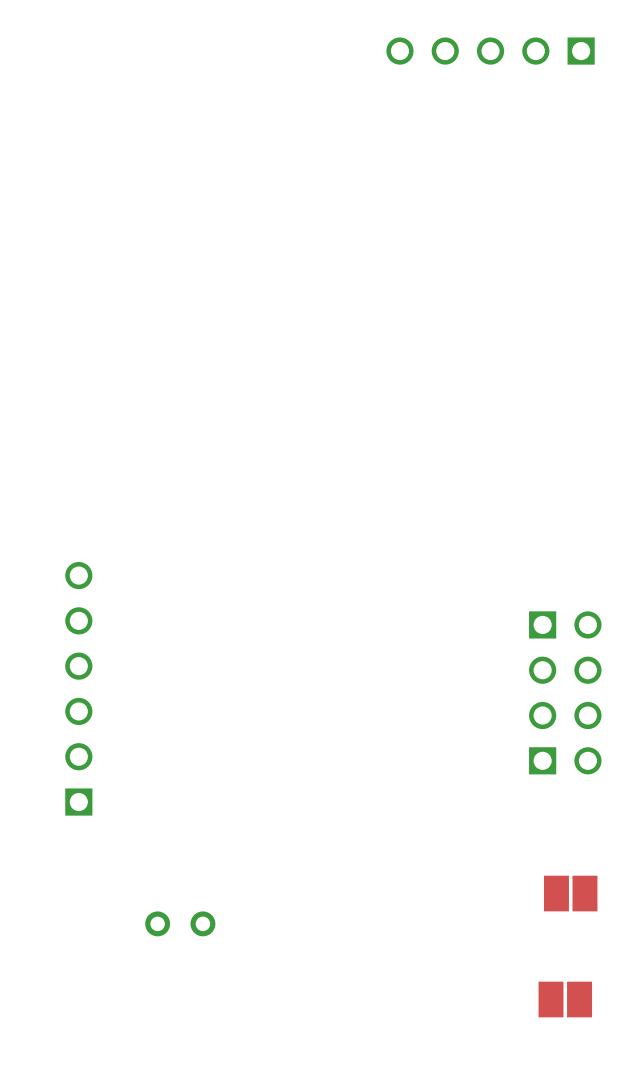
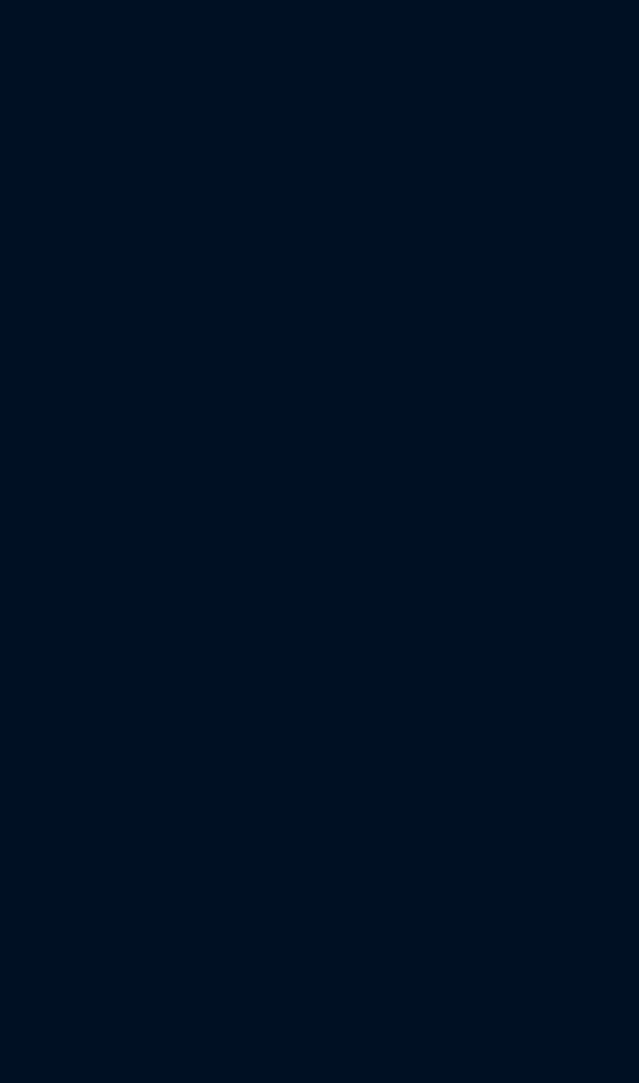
part: (490, 51) -> none
part: (78, 688) -> none
part: (565, 692) -> none
part: (570, 893) -> none
part: (180, 923) -> none
part: (565, 999) -> none

